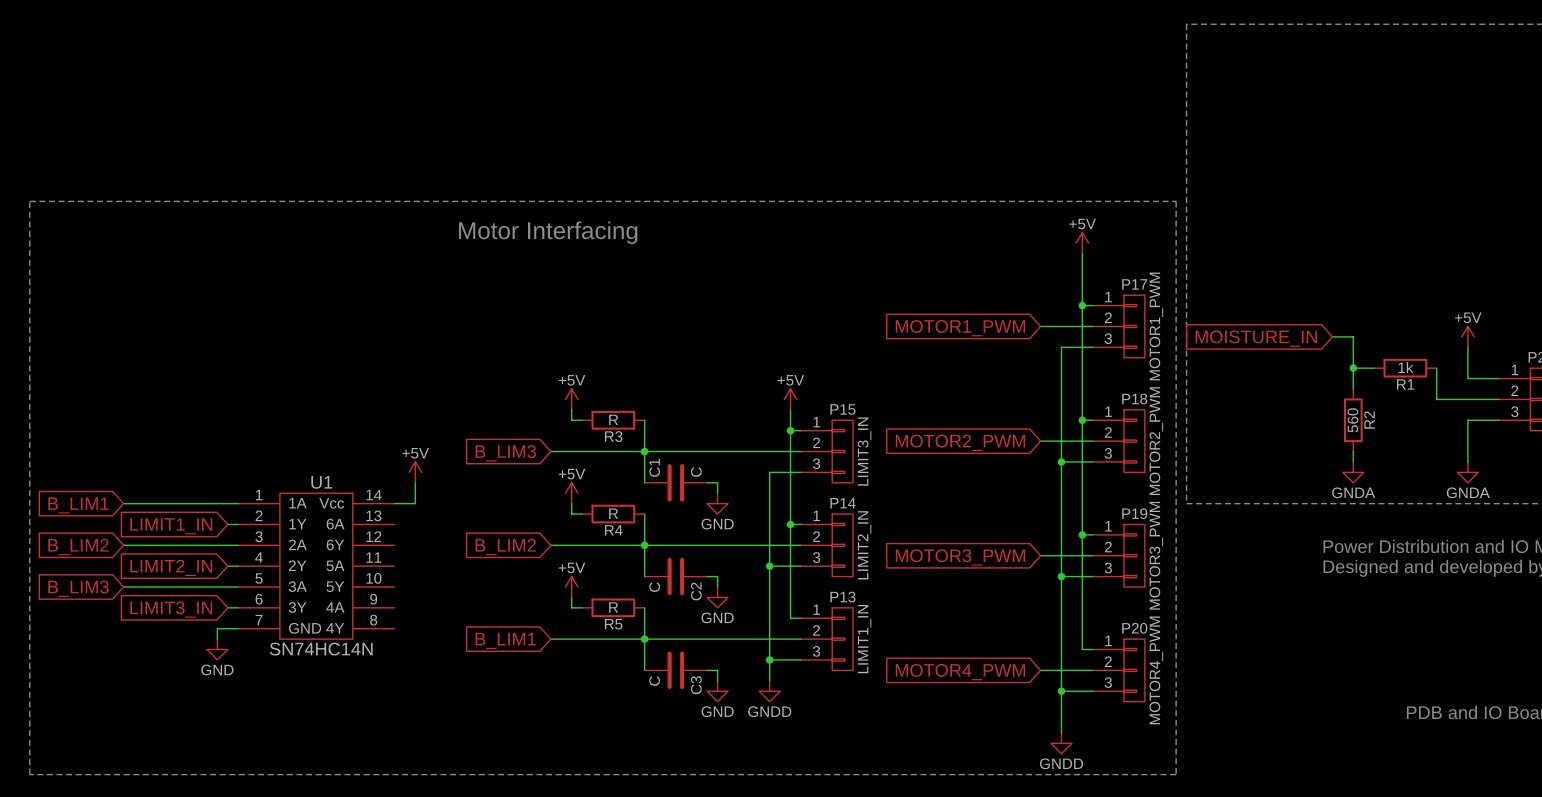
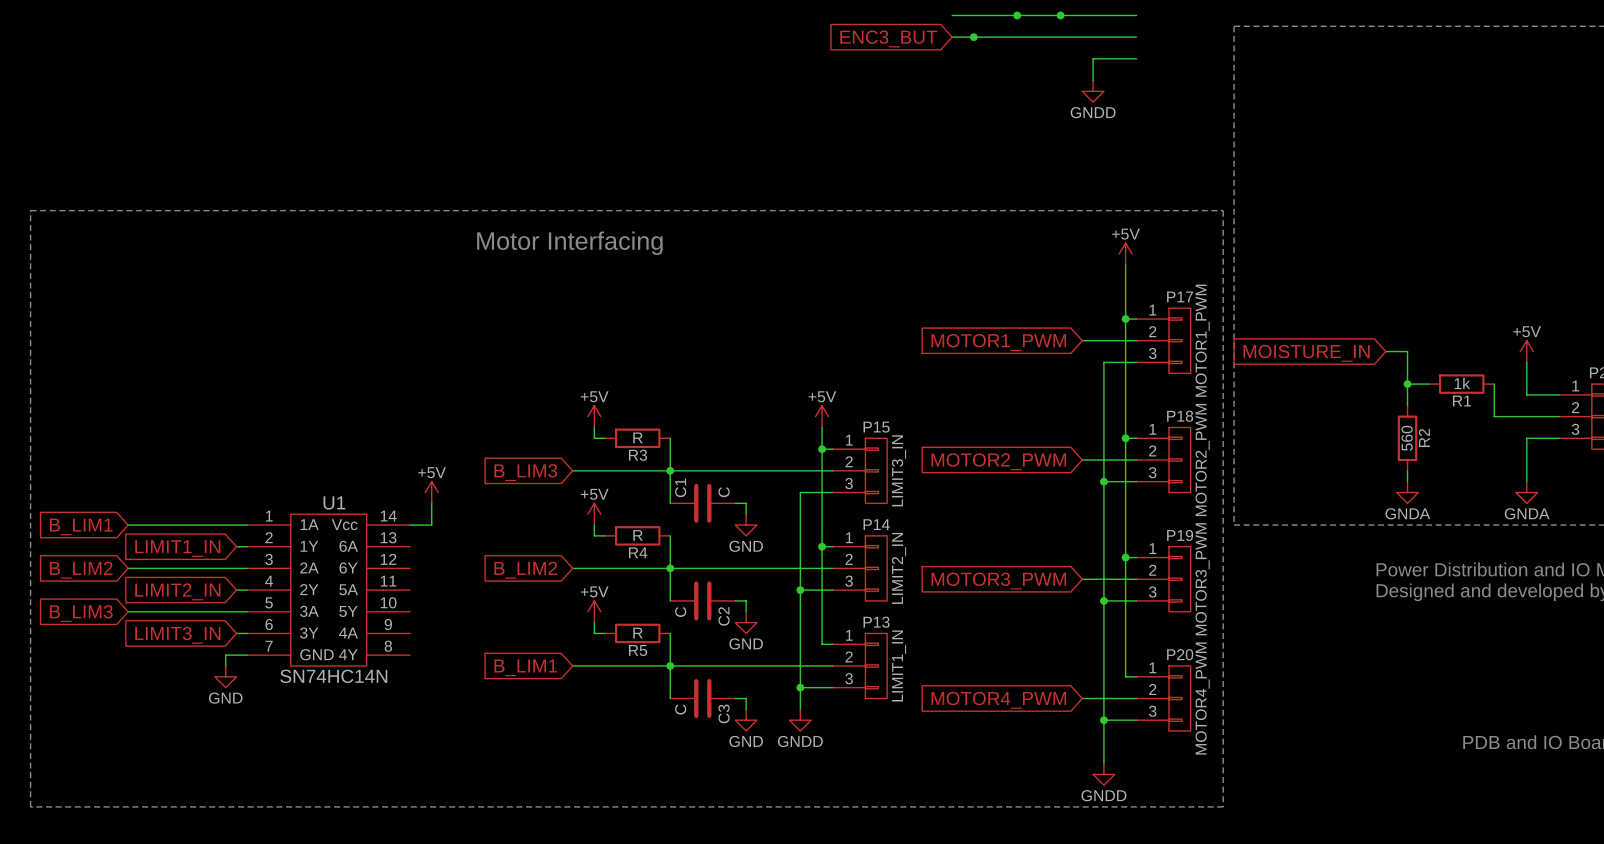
wire: none -> (952, 15) (1136, 15)
junction: none -> (1017, 15)
junction: none -> (1060, 15)
wire: none -> (952, 37) (1136, 37)
junction: none -> (973, 37)
global label: none -> ENC3_BUT (888, 38)
wire: none -> (1136, 58) (1093, 58) (1093, 80)
power symbol: none -> GNDD (1093, 91)

